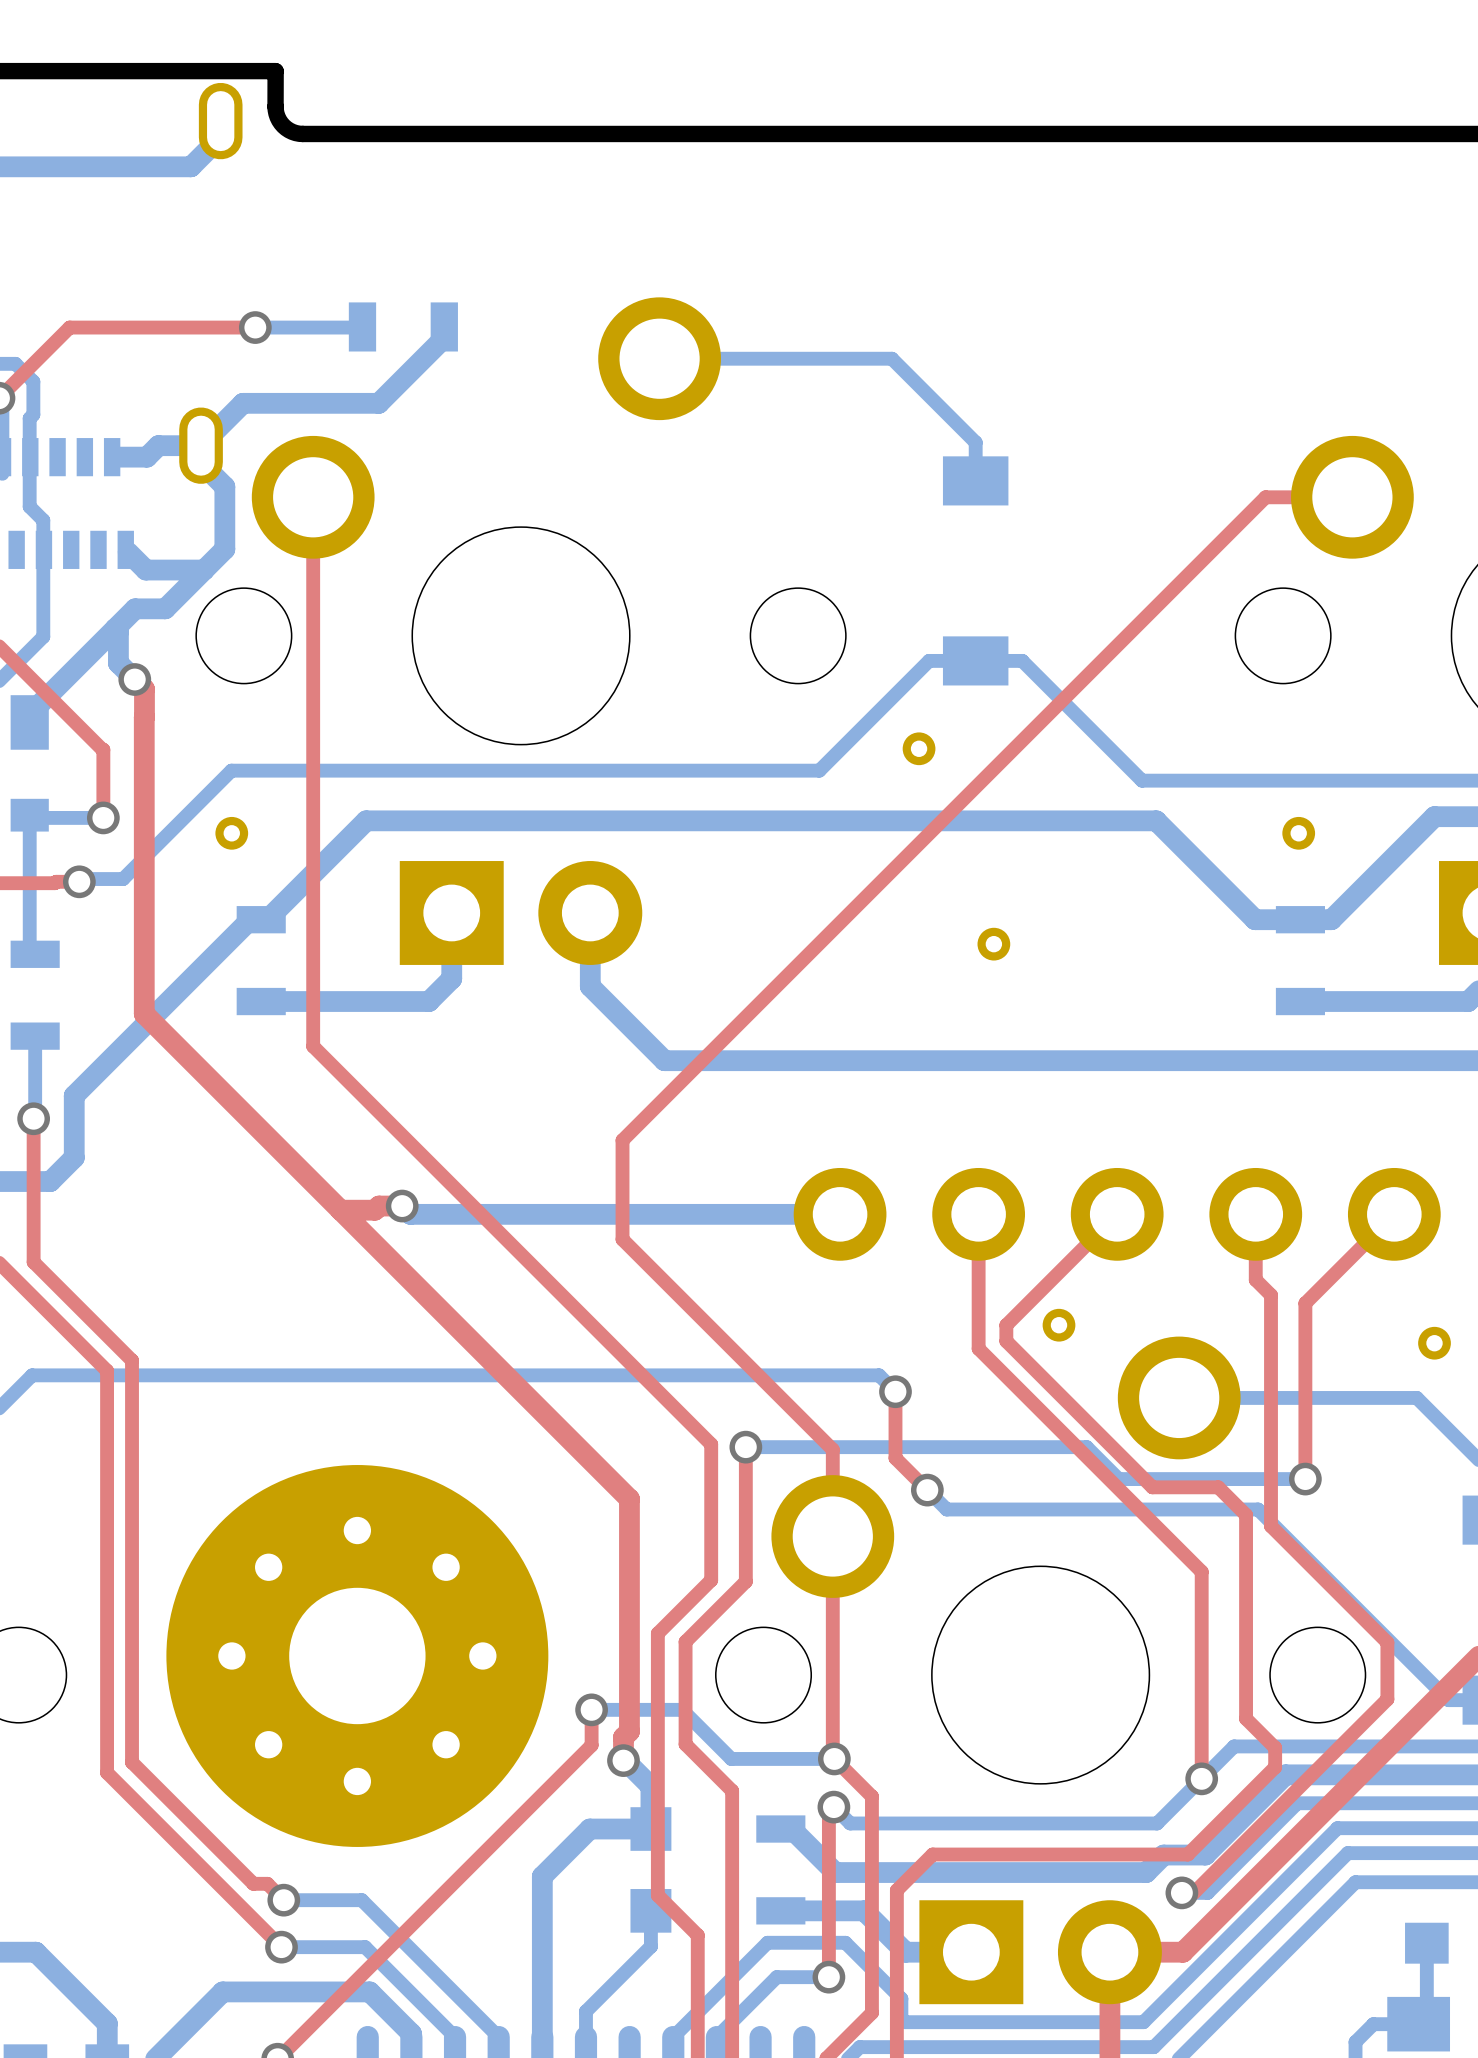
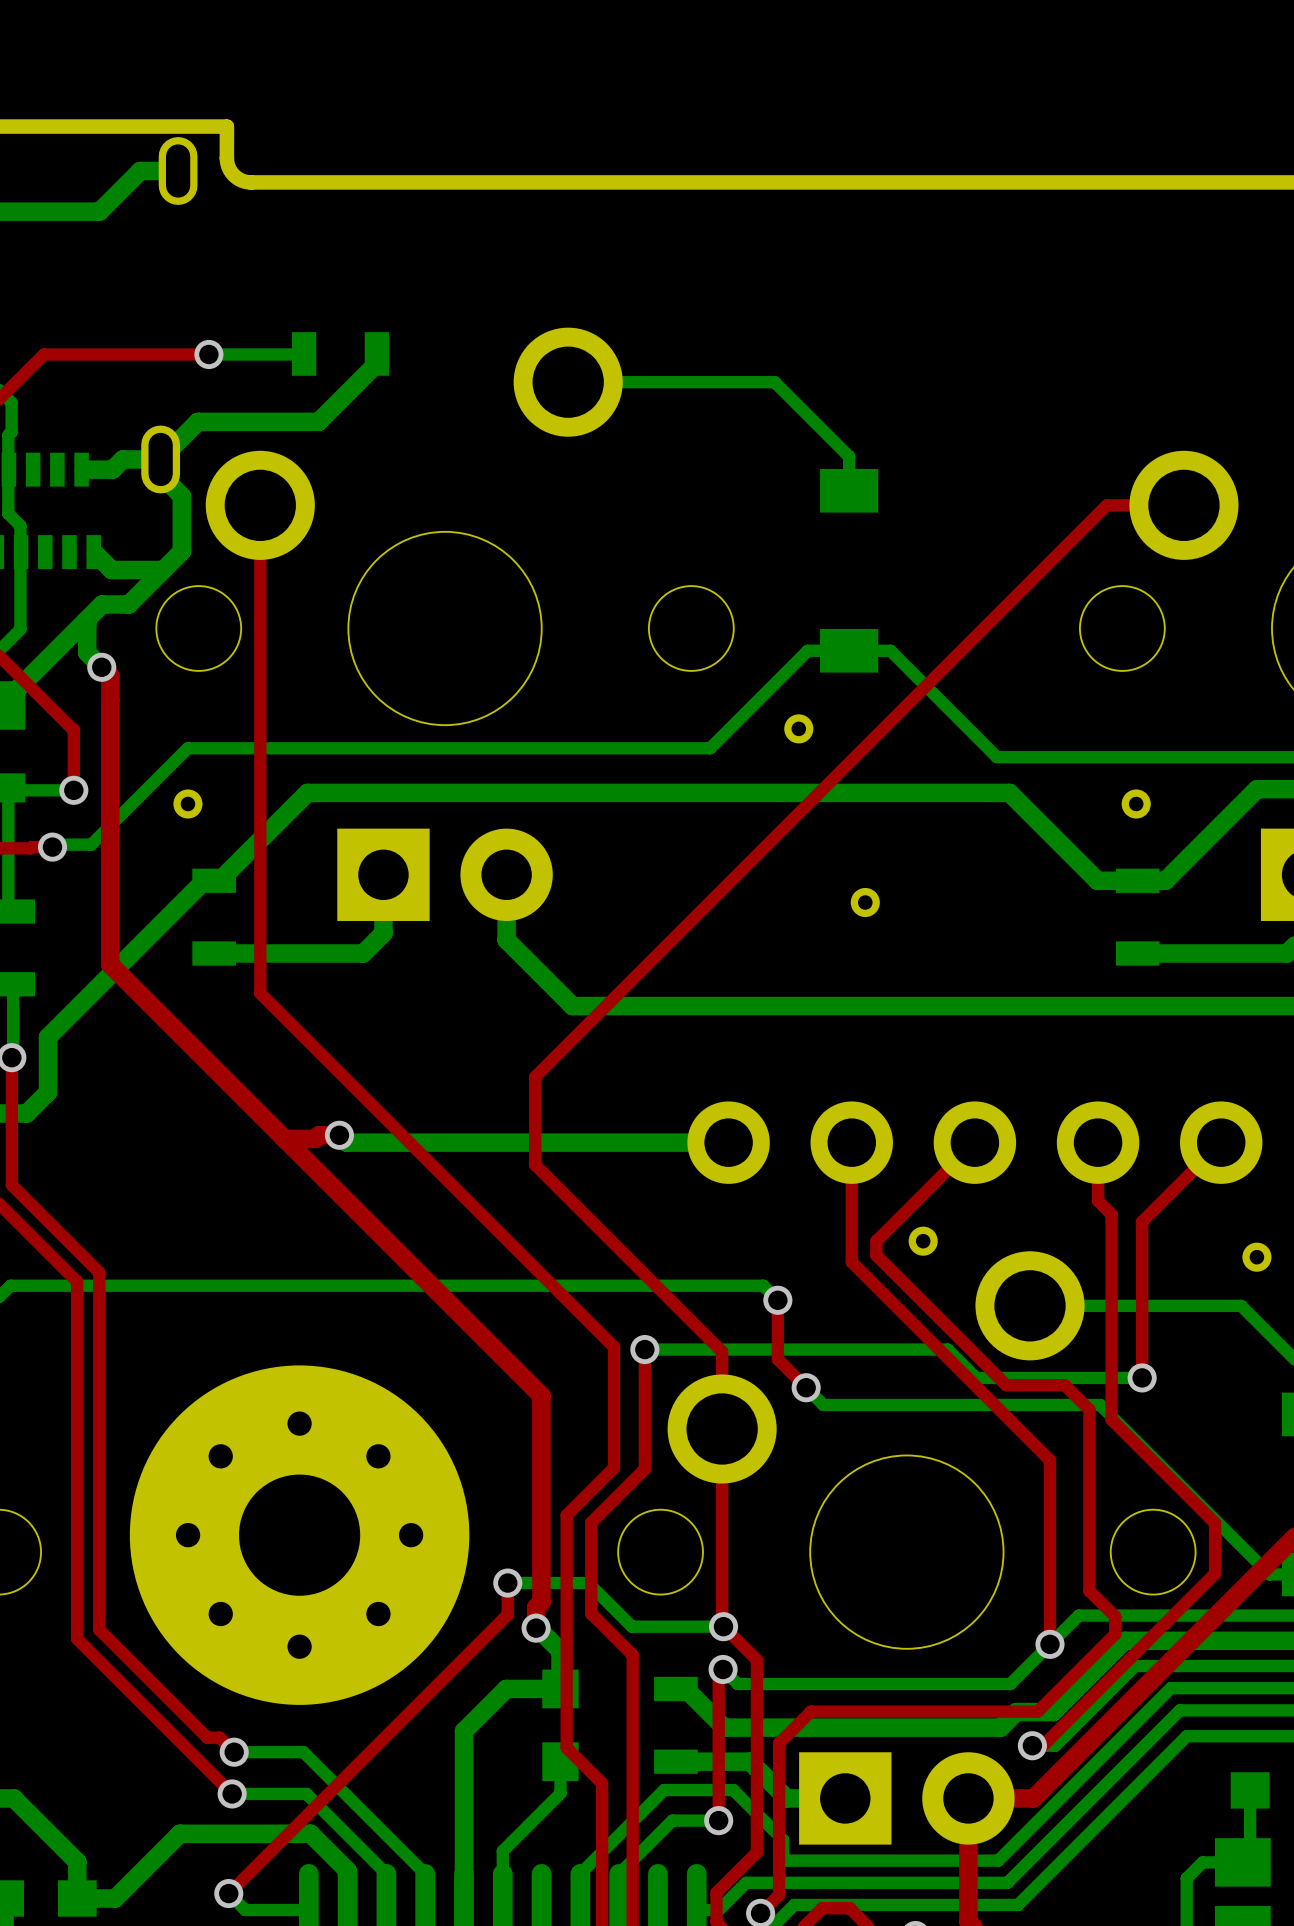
bottom track: (220, 137) (190, 166) (132, 166) -> (178, 170) (140, 170) (99, 211)

